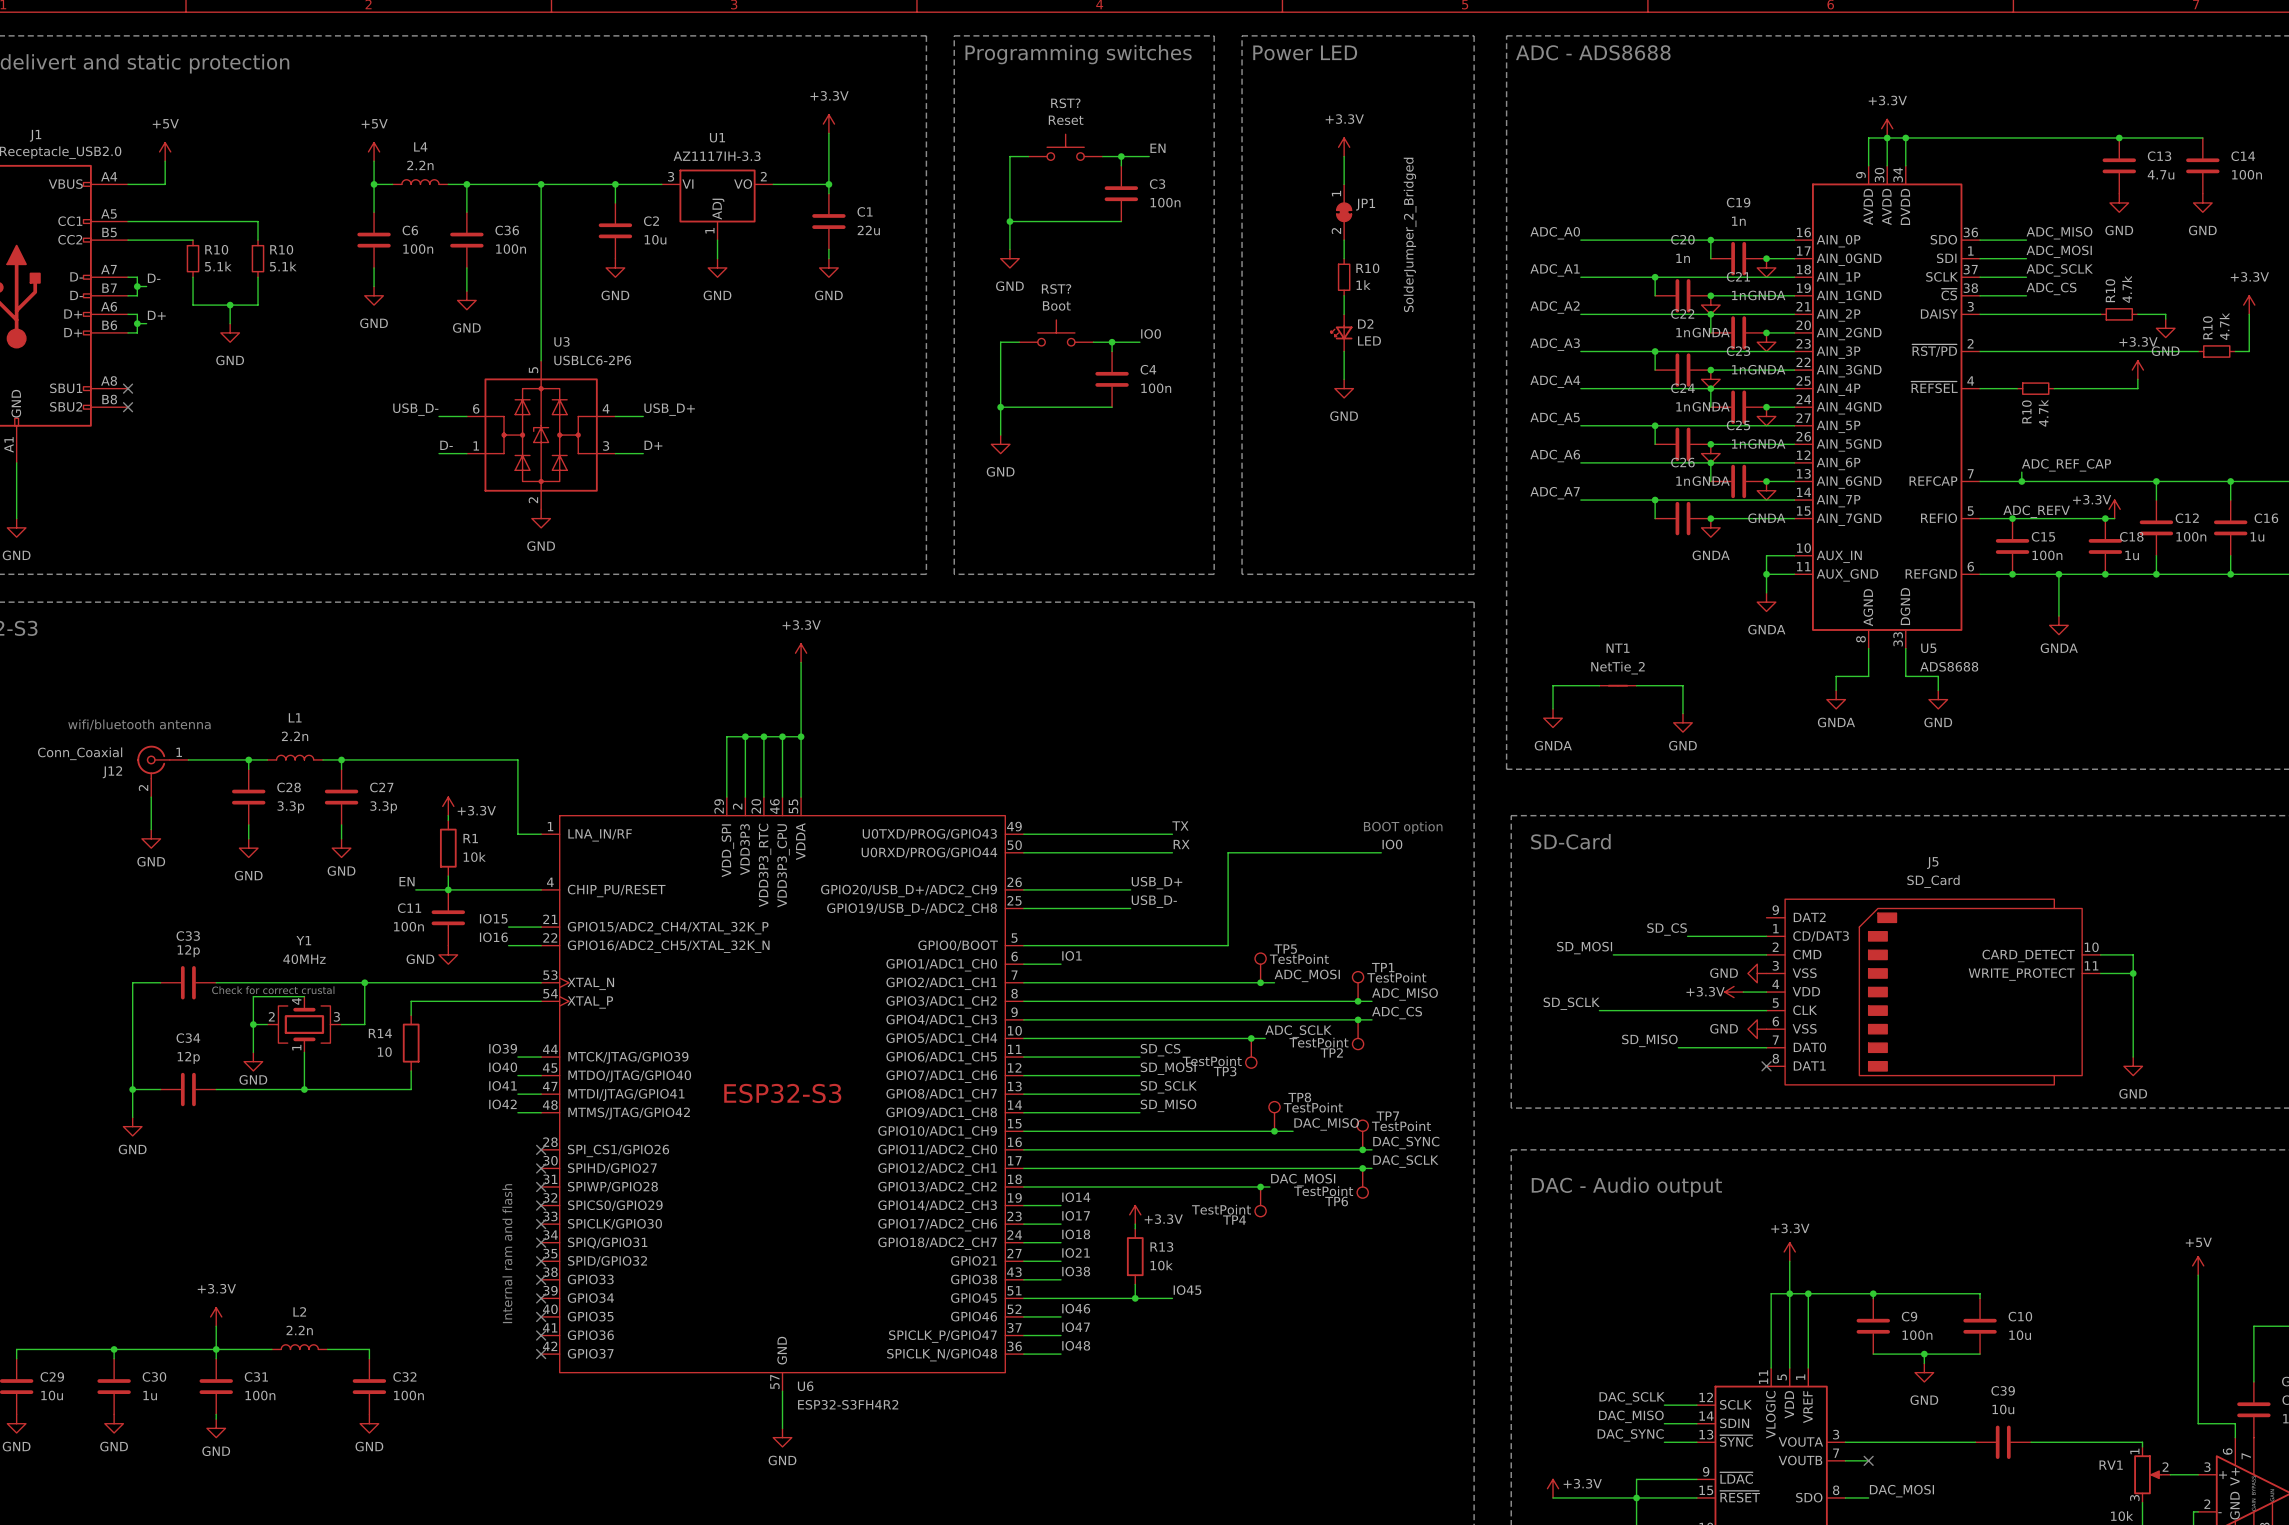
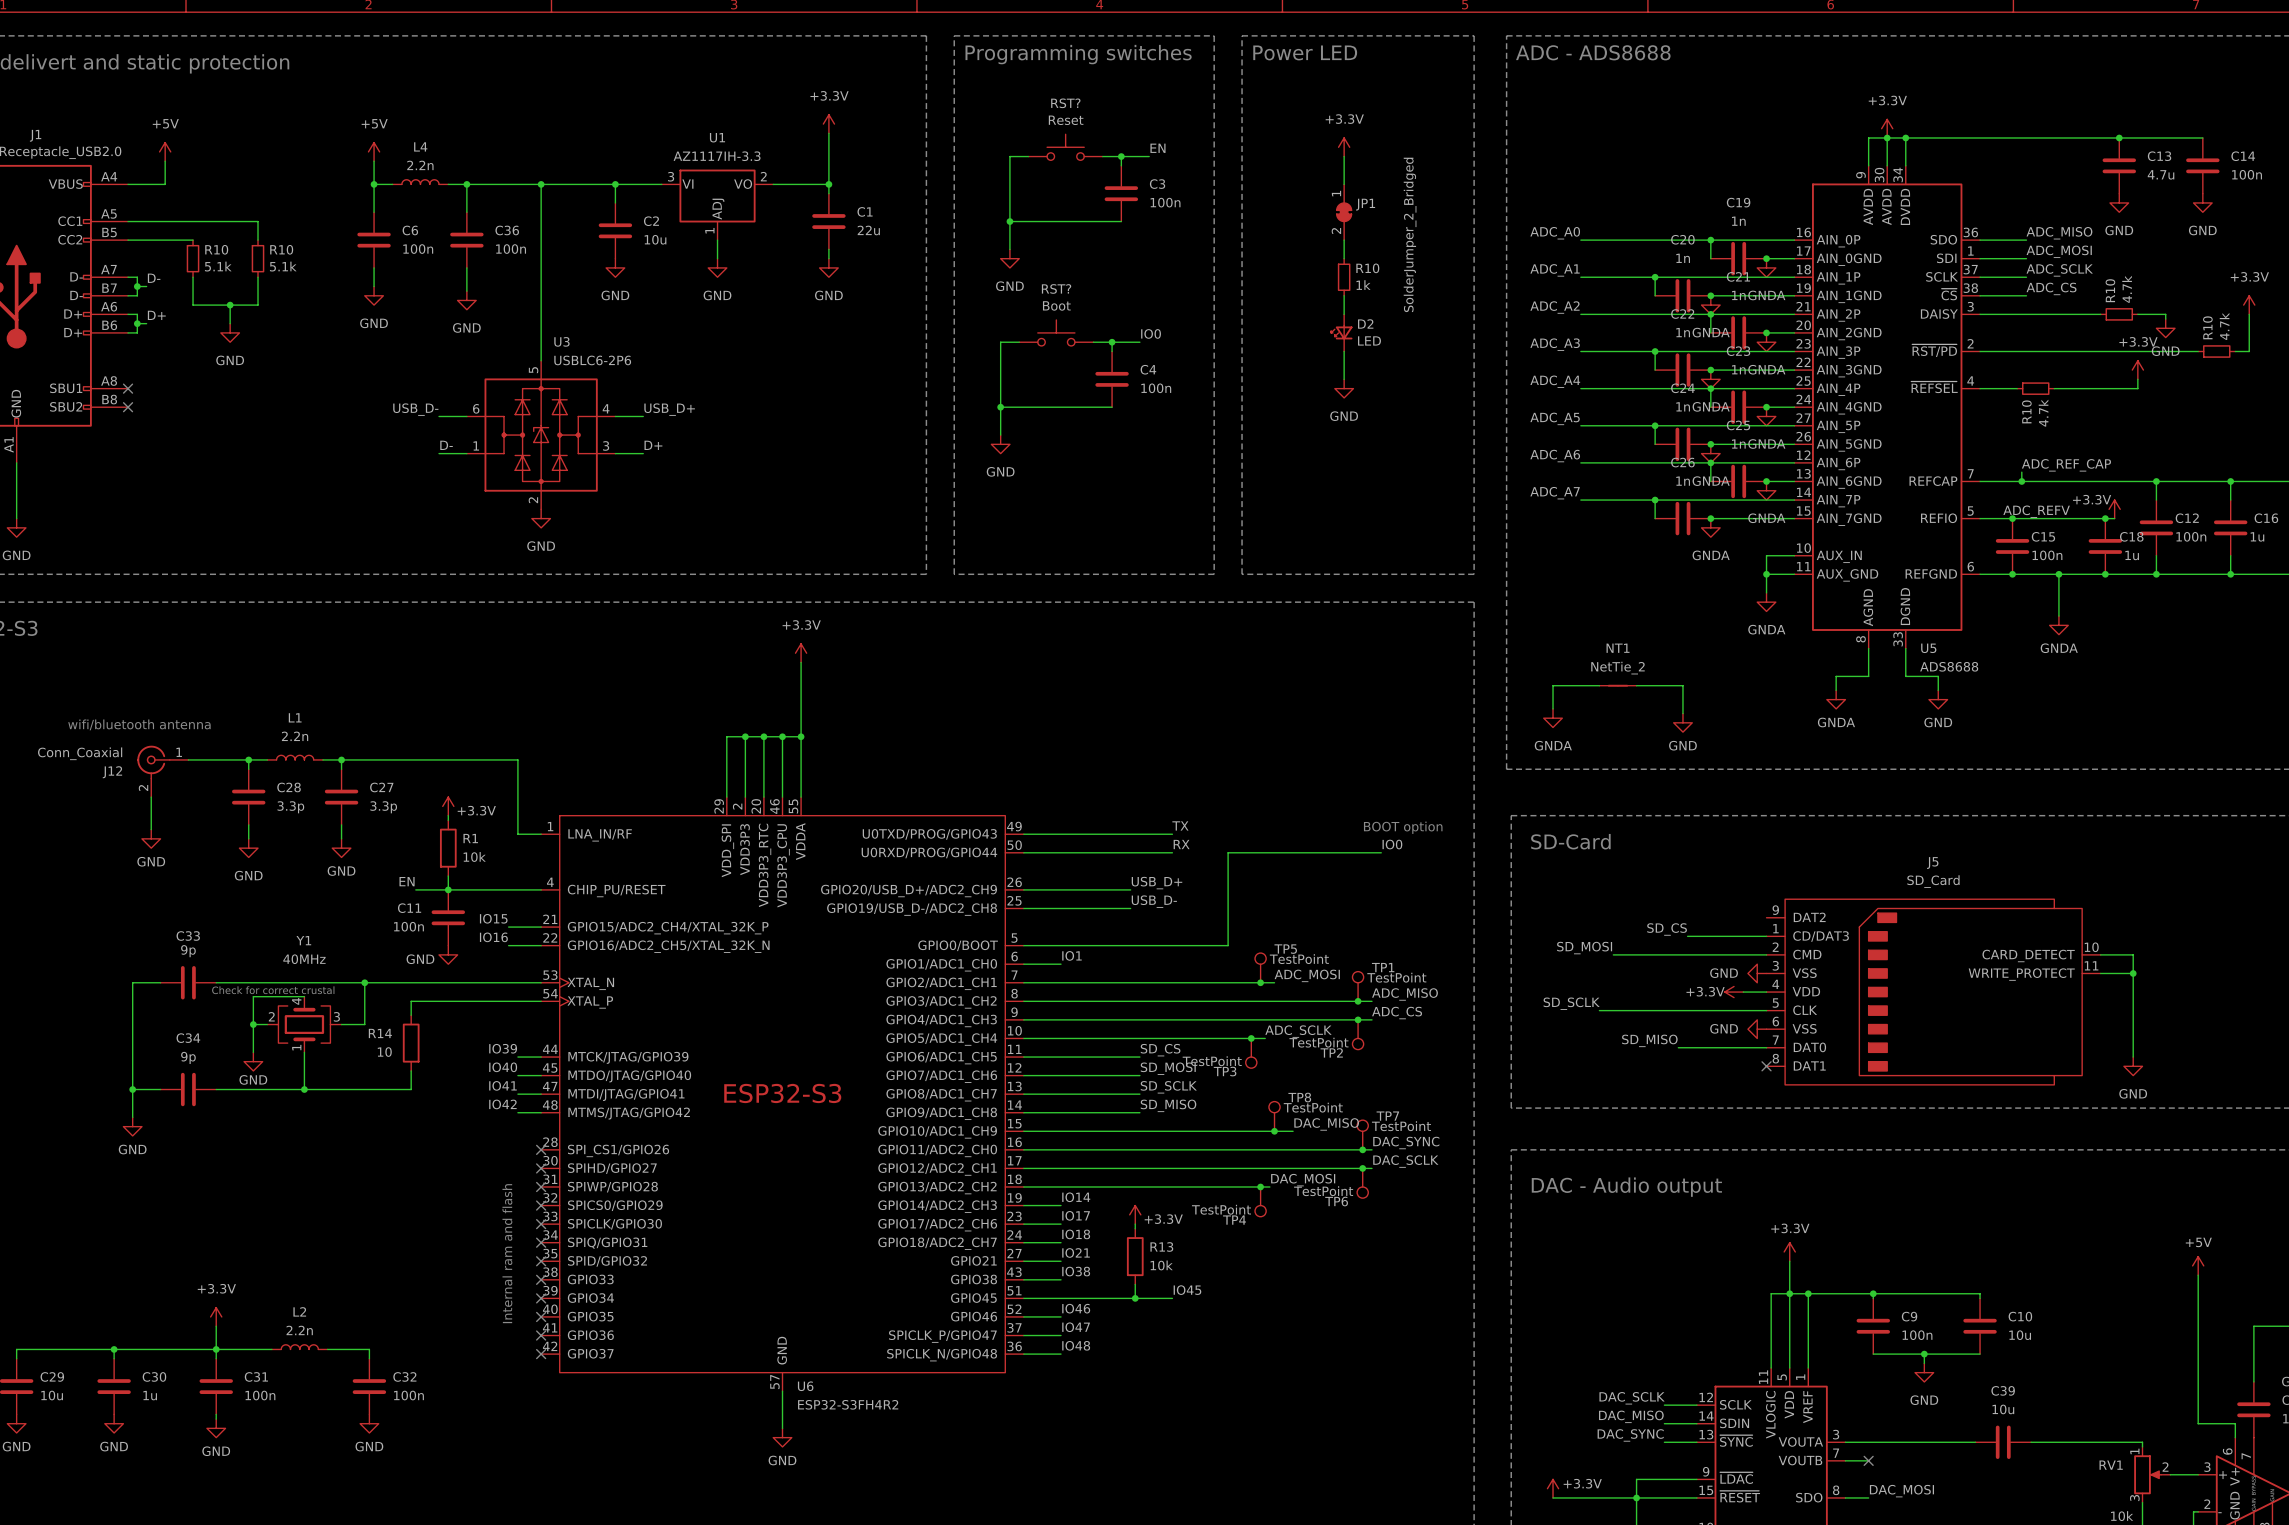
C33 value: 12p (188, 951) -> 9p (188, 951)
C34 value: 12p (188, 1057) -> 9p (188, 1057)

